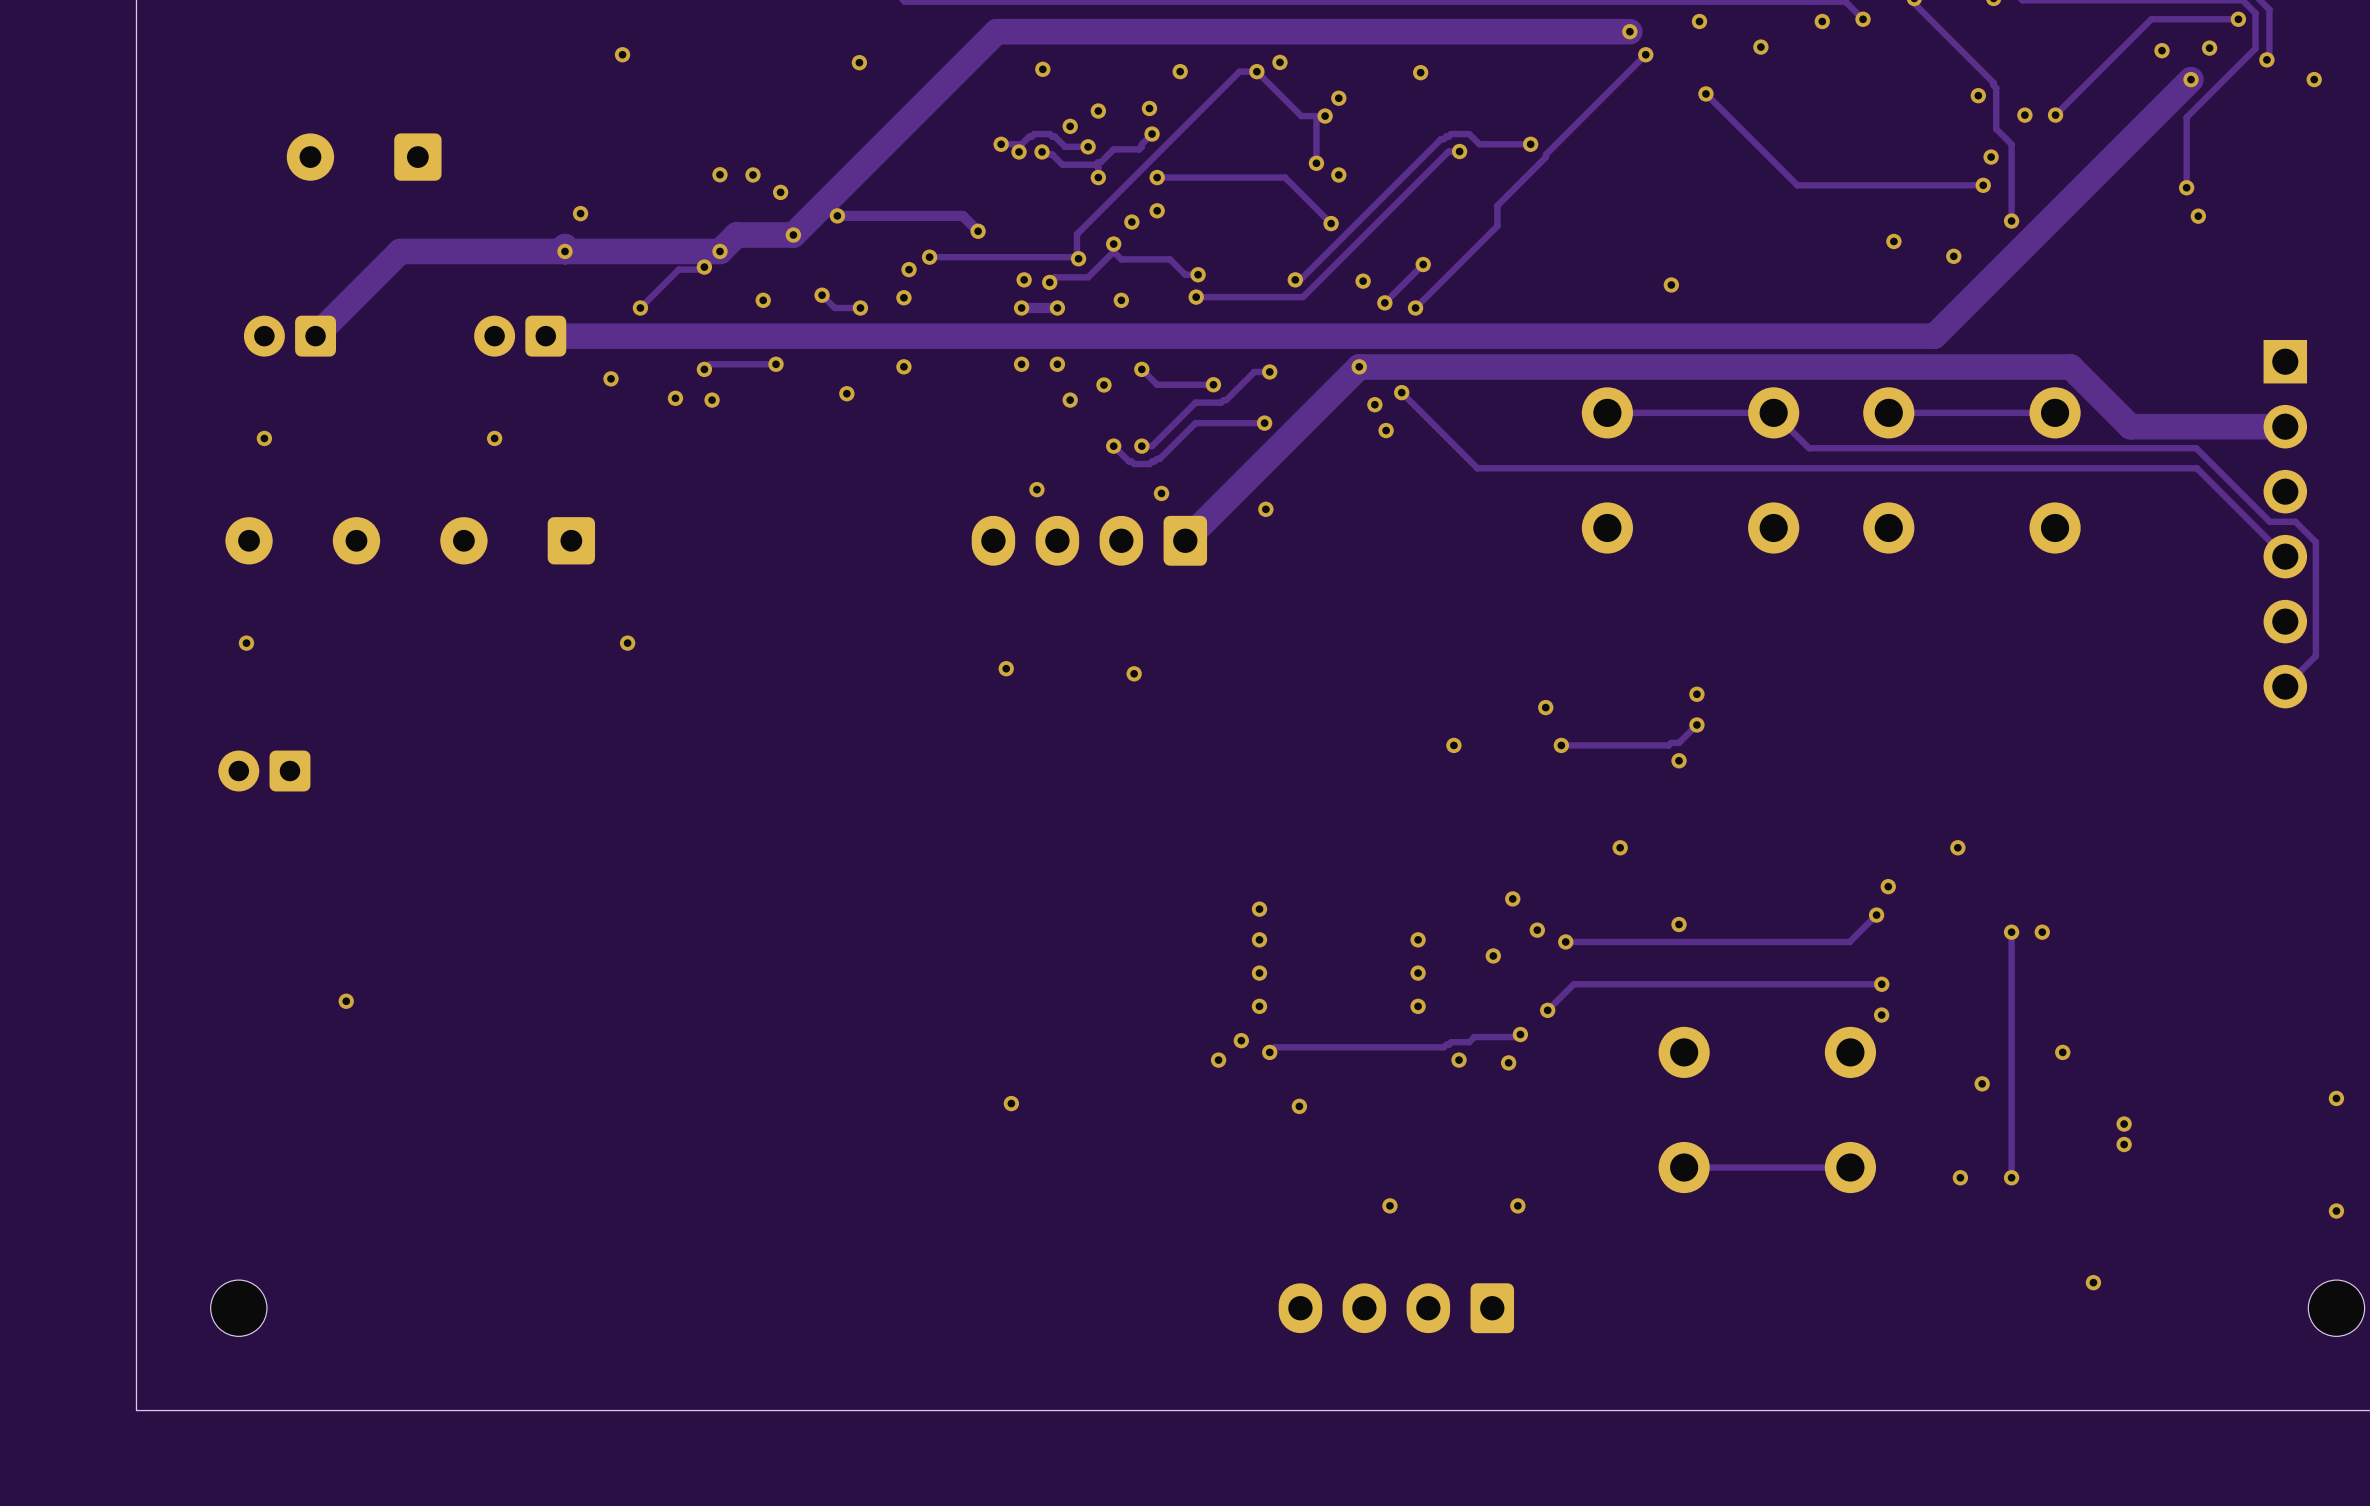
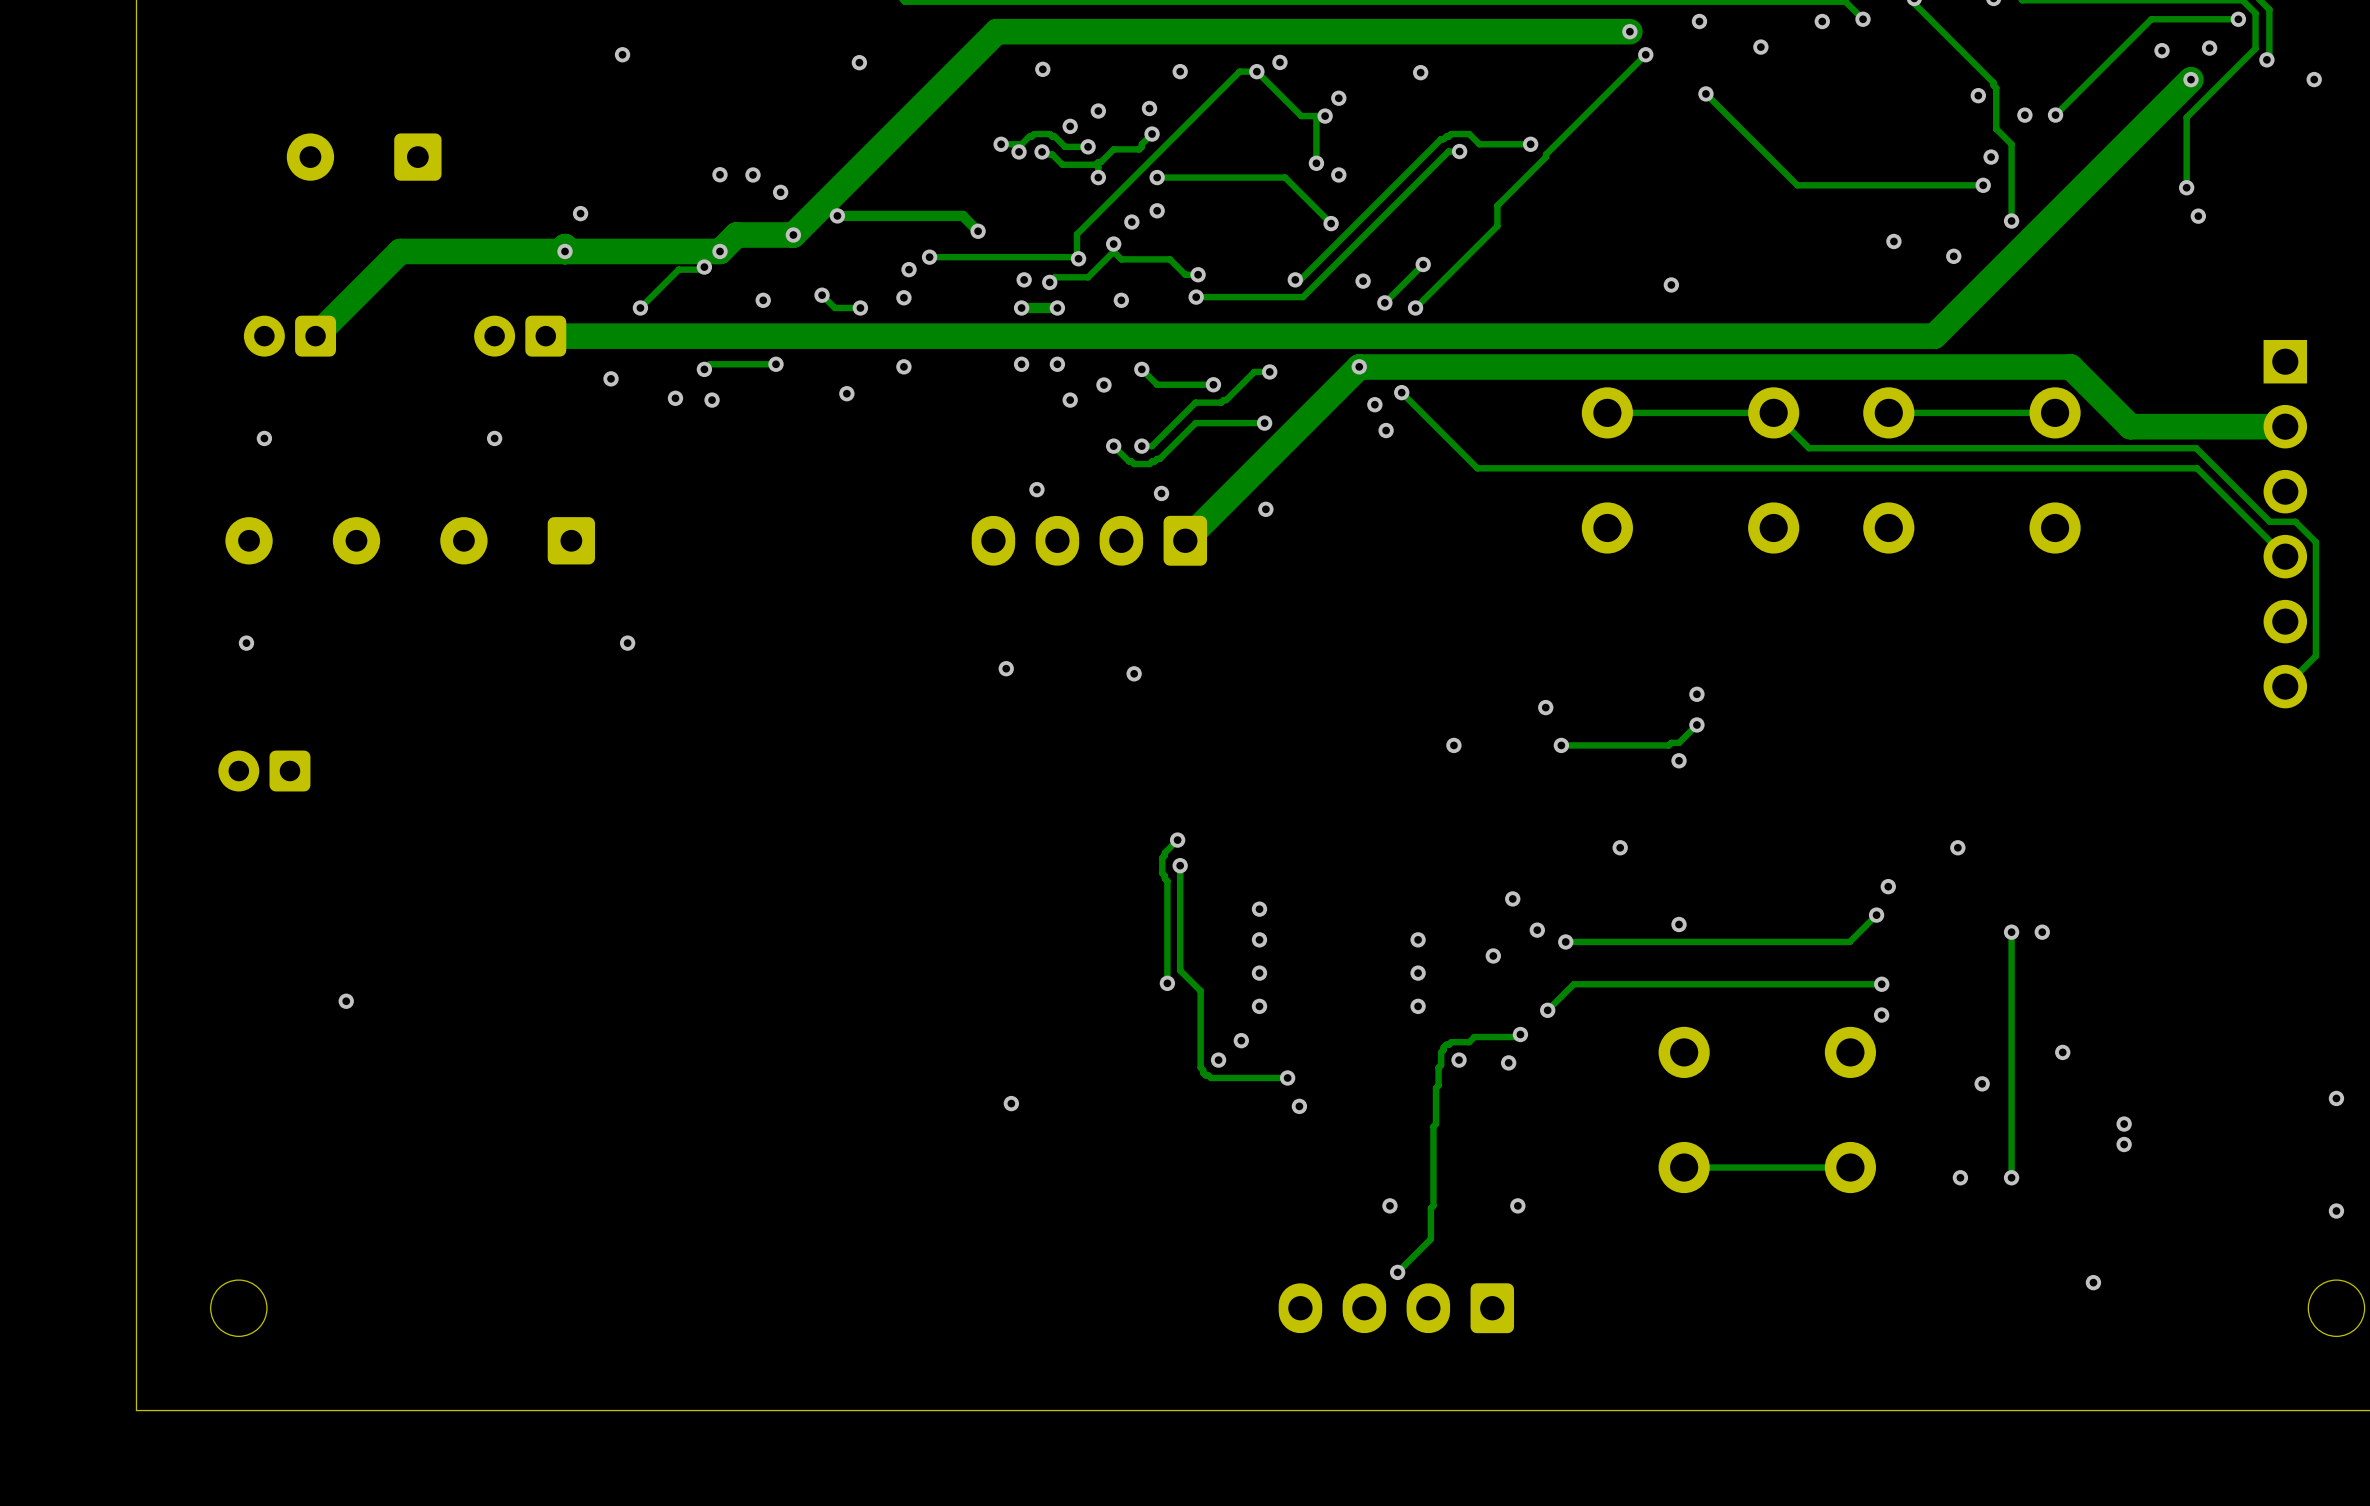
track: none -> (1177, 840) (1162, 857) (1162, 873) (1167, 881) (1167, 983)
via: none -> (1177, 840)
track: none -> (1180, 865) (1180, 970) (1200, 991) (1200, 1067) (1203, 1072) (1210, 1077) (1287, 1077)
via: none -> (1180, 865)
via: none -> (1167, 983)
track: (1443, 1047) (1274, 1047) (1269, 1052) -> (1443, 1047) (1441, 1052) (1441, 1065) (1438, 1067) (1438, 1085) (1436, 1088) (1436, 1124) (1433, 1126) (1433, 1205) (1430, 1208) (1430, 1239) (1397, 1272)
via position: (1269, 1052) -> (1287, 1077)
via: none -> (1397, 1272)

